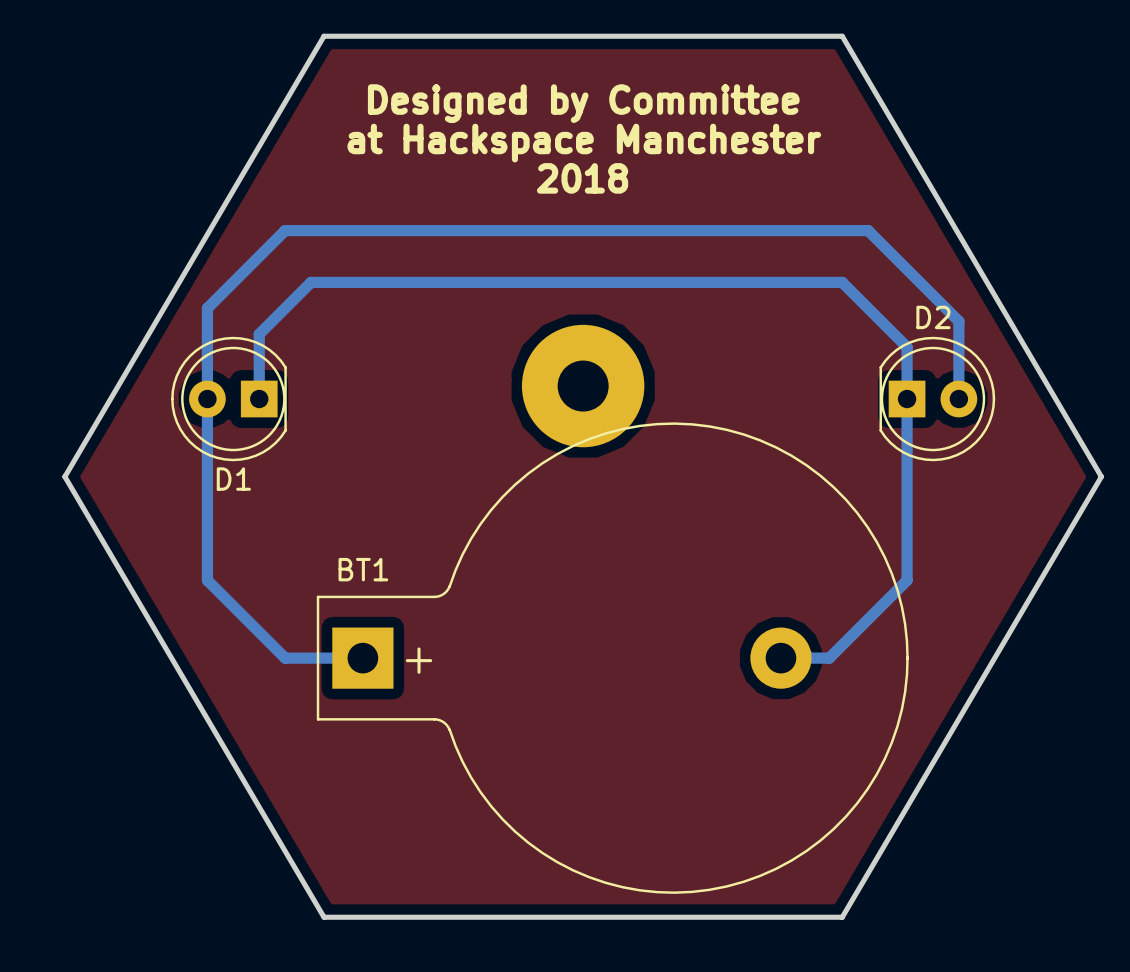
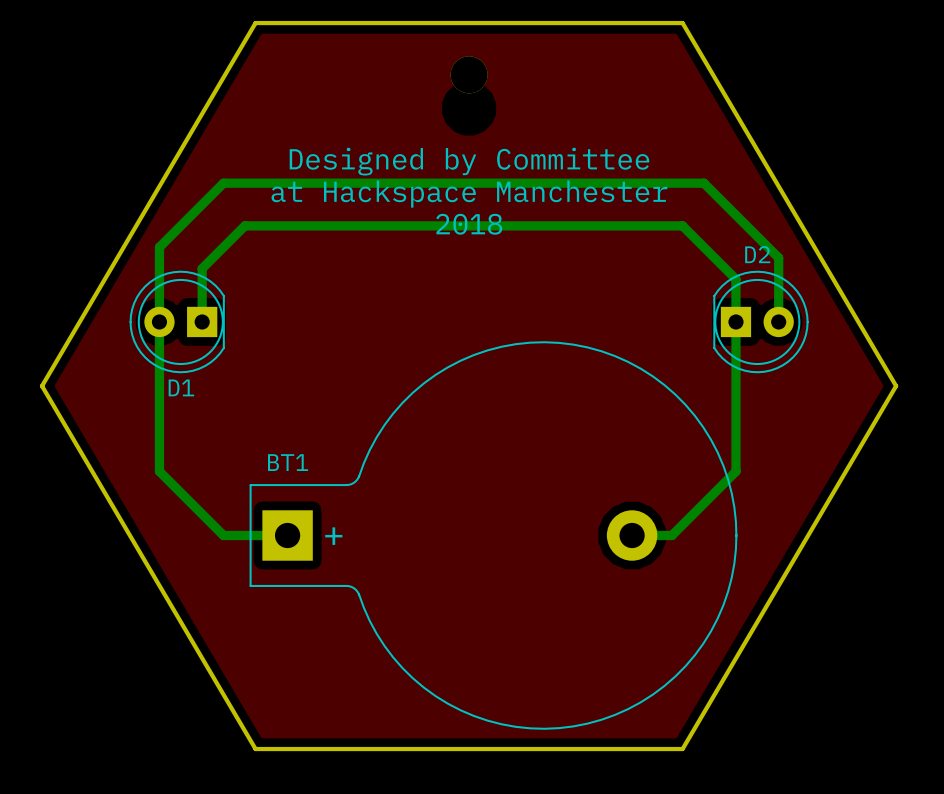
part: none -> (469, 74)
text position: Designed by Committee (583, 103) -> Designed by Committee (469, 161)
text position: at Hackspace Manchester (584, 143) -> at Hackspace Manchester (469, 194)
text position: 2018 (582, 178) -> 2018 (469, 224)
part: (583, 386) -> none

